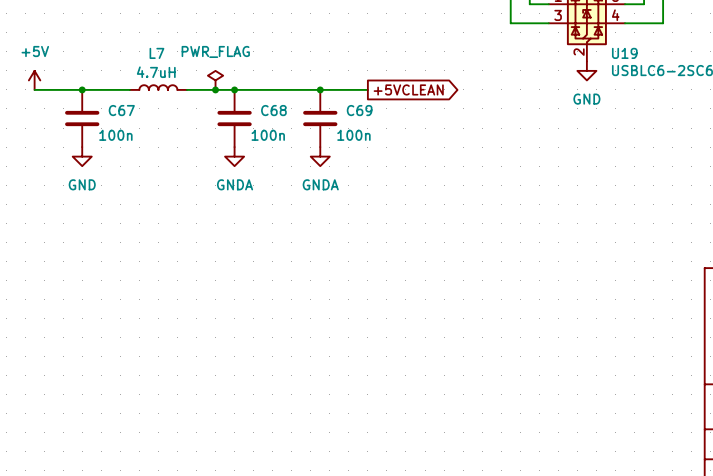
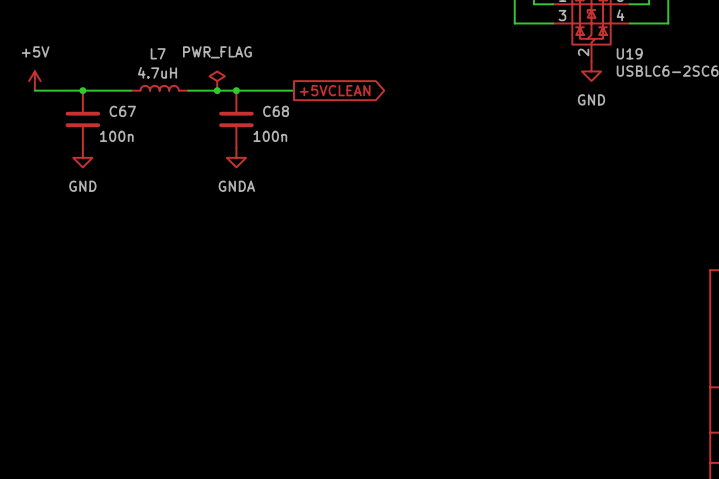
wire: (291, 89) (367, 89) -> none
junction: (320, 89) -> none
global label position: +5VCLEAN (408, 89) -> +5VCLEAN (335, 90)
C69: 100n (320, 118) -> none
power symbol: GNDA (320, 156) -> none

